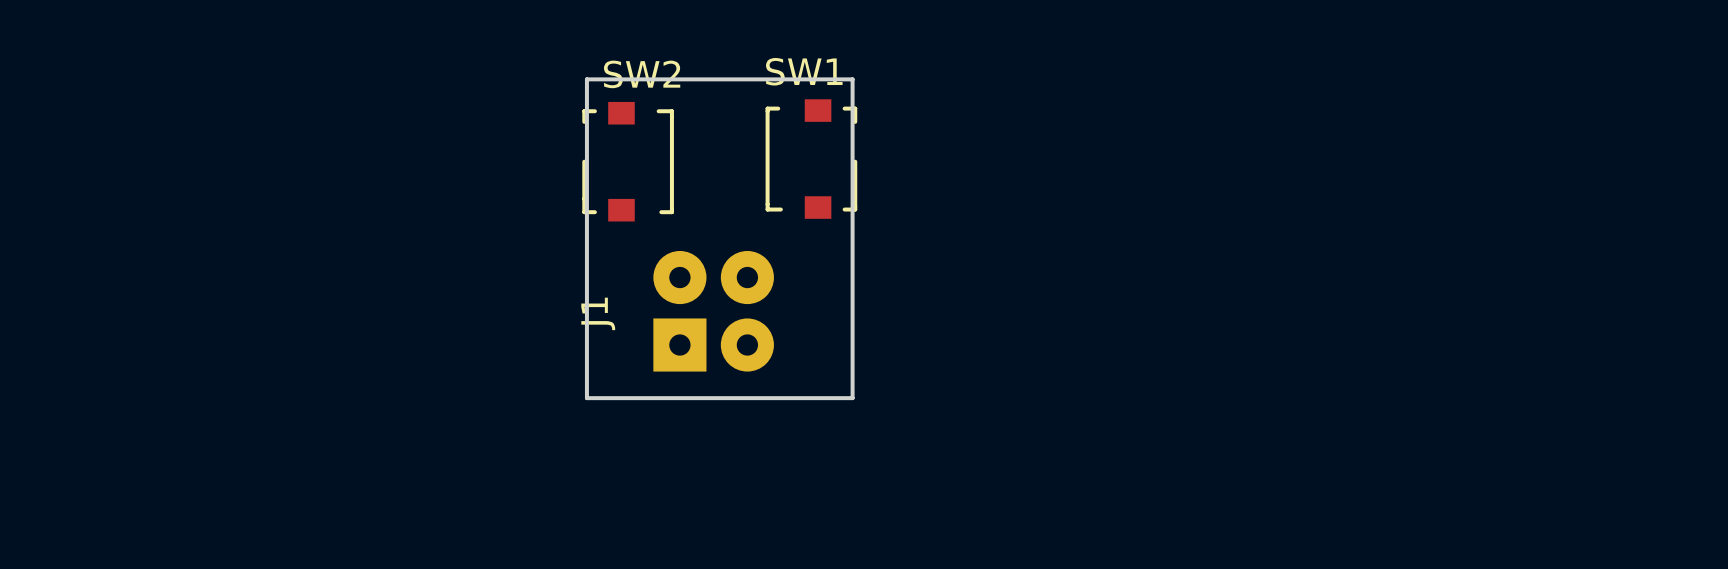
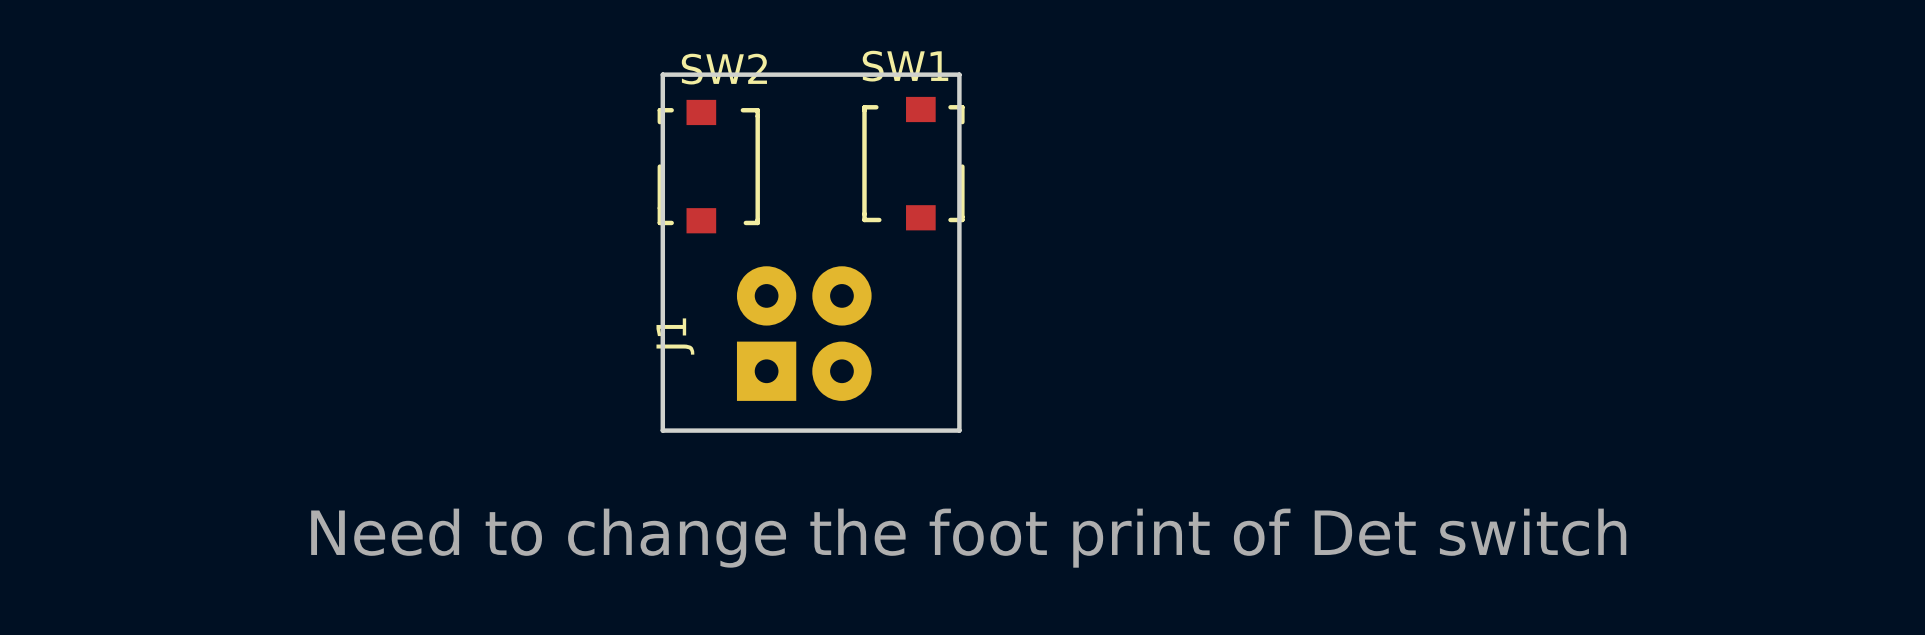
text: none -> Need to change the foot print of Det switch (968, 538)

